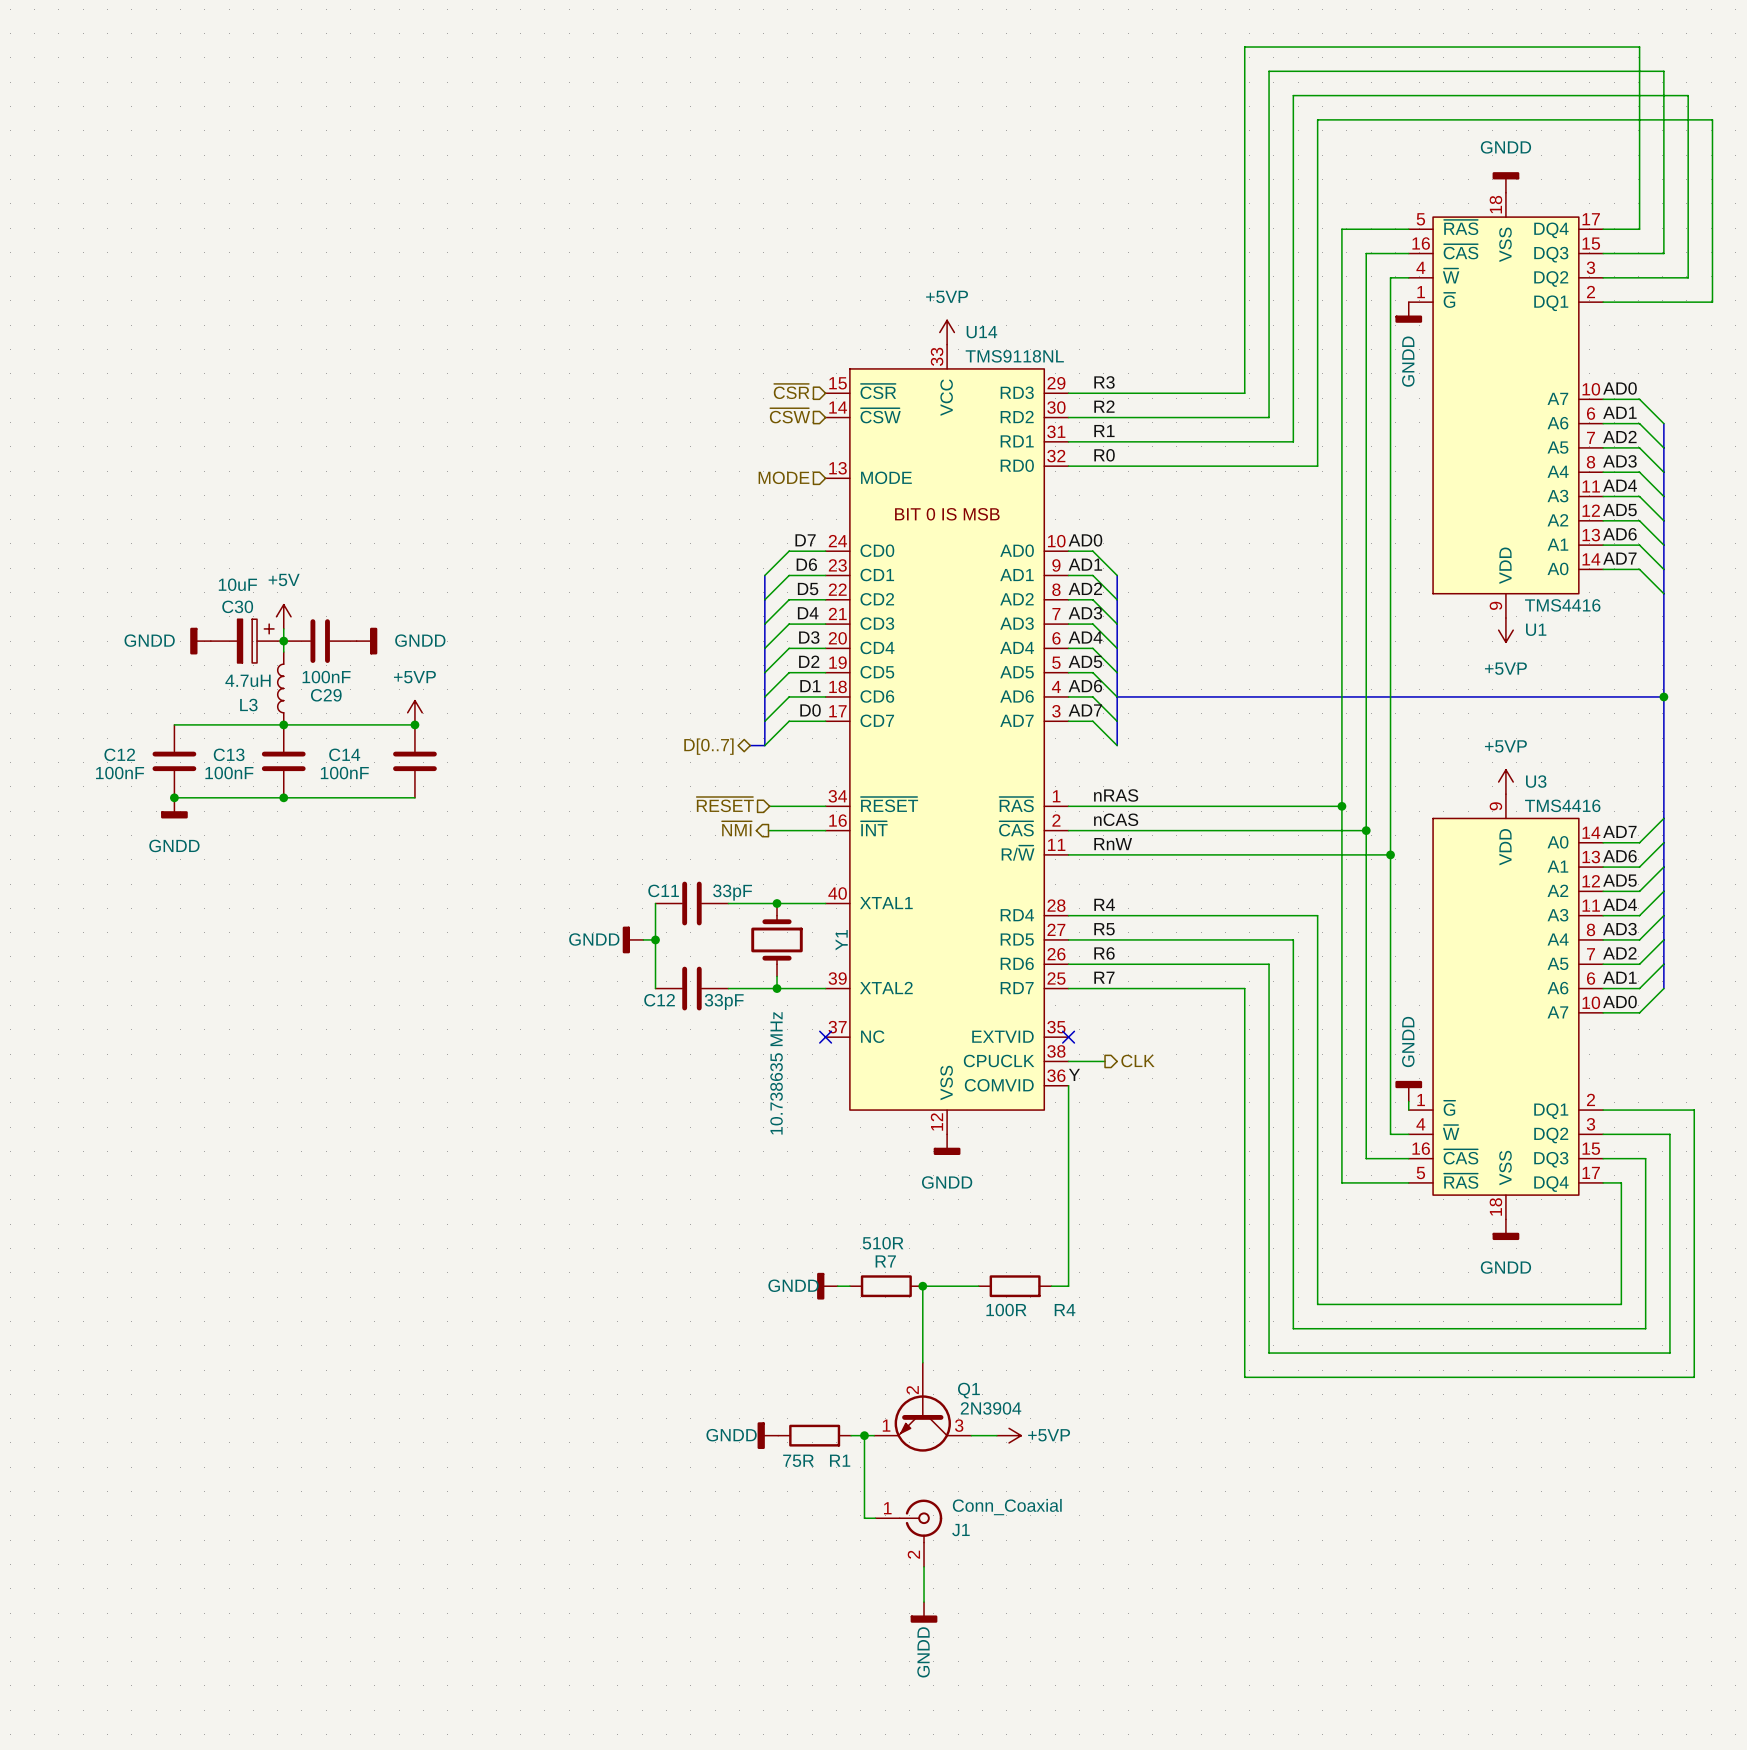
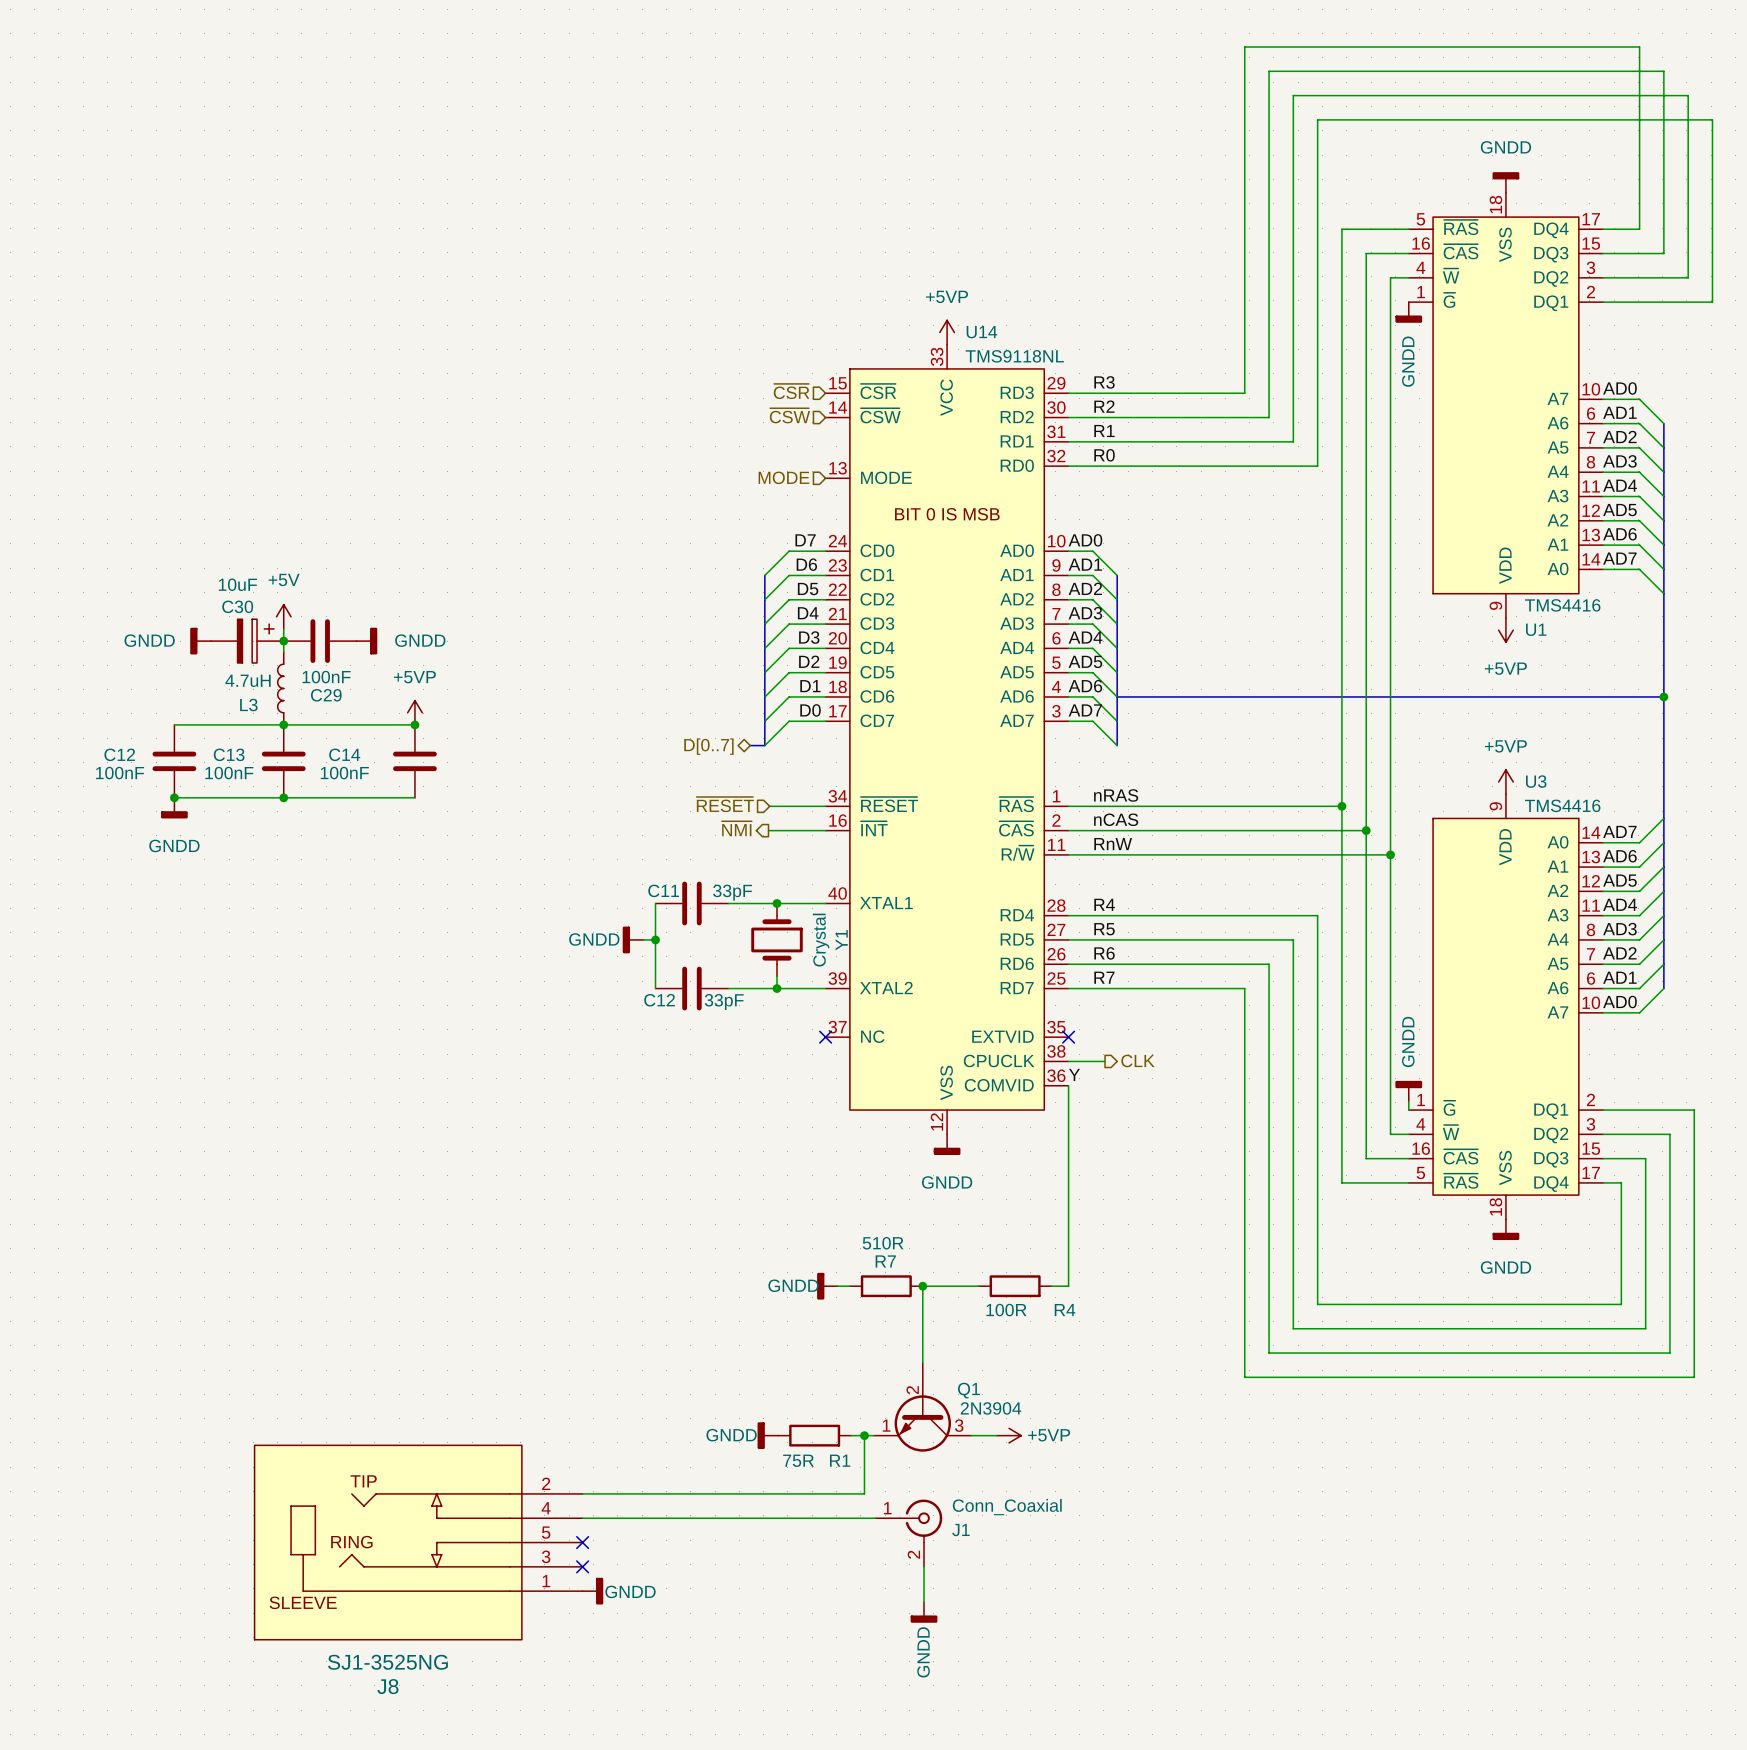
Y1 value: 10.738635 MHz (776, 1073) -> Crystal (821, 940)
wire: (864, 1493) (864, 1518) -> (864, 1493) (582, 1493)
wire: none -> (582, 1518) (864, 1518)
J8: none -> SJ1-3525NG (418, 1542)
no-connect mark: none -> (582, 1542)
no-connect mark: none -> (582, 1566)
power symbol: none -> GNDD (592, 1591)

